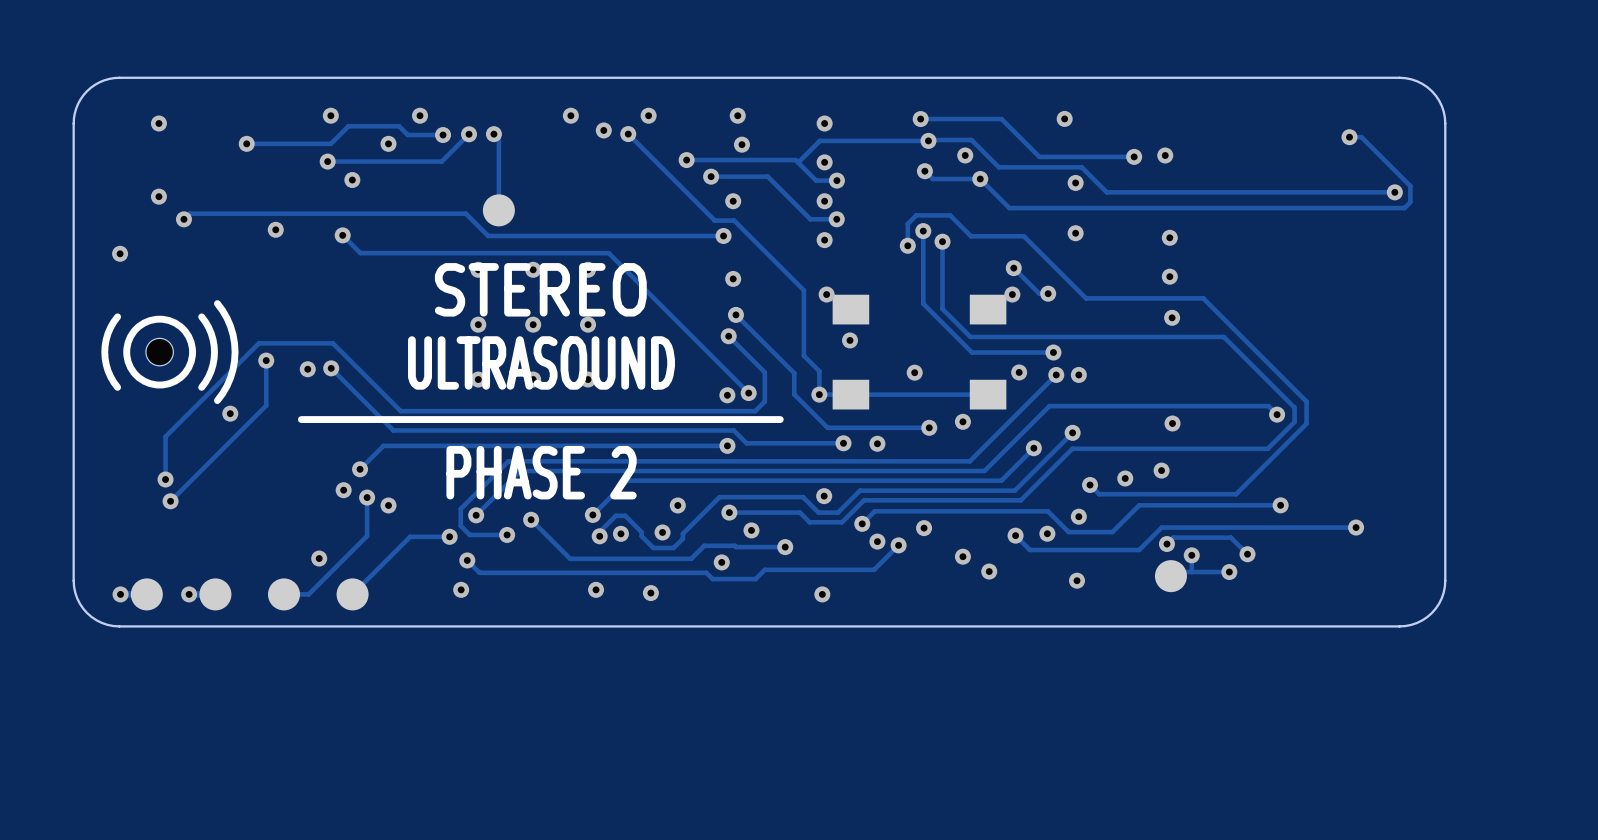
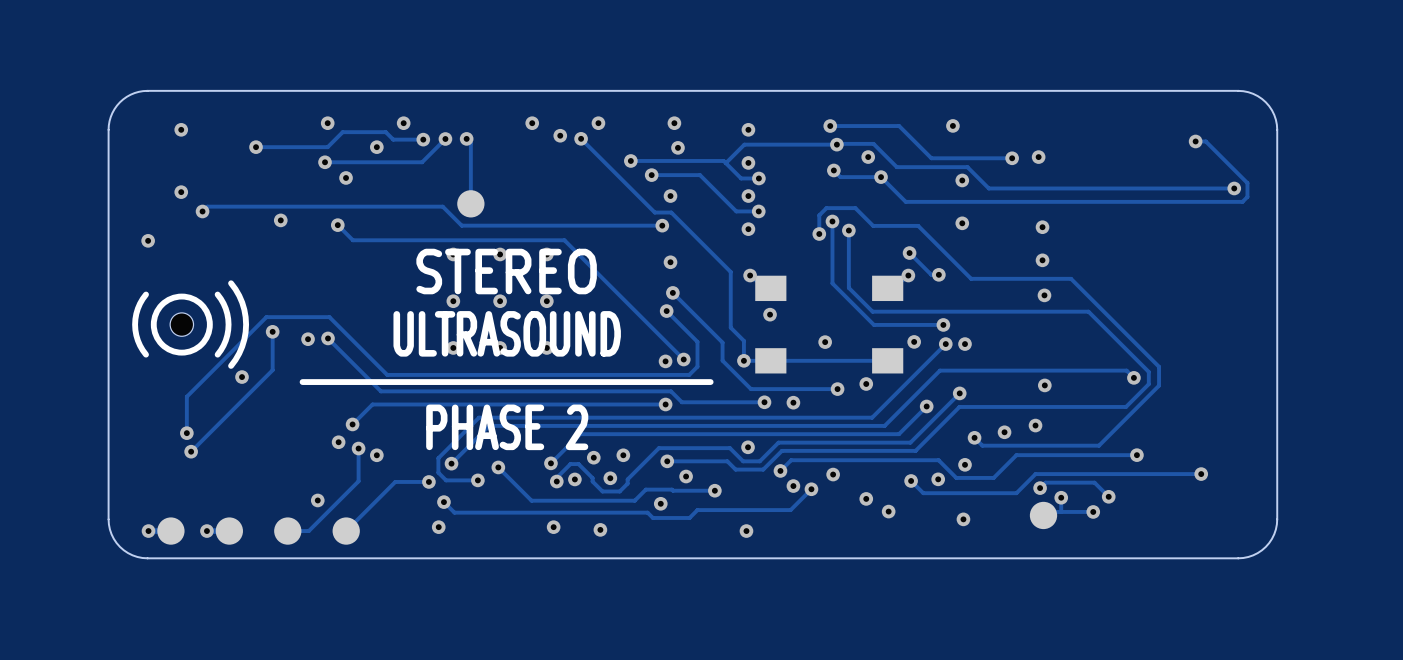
via: none -> (593, 457)

